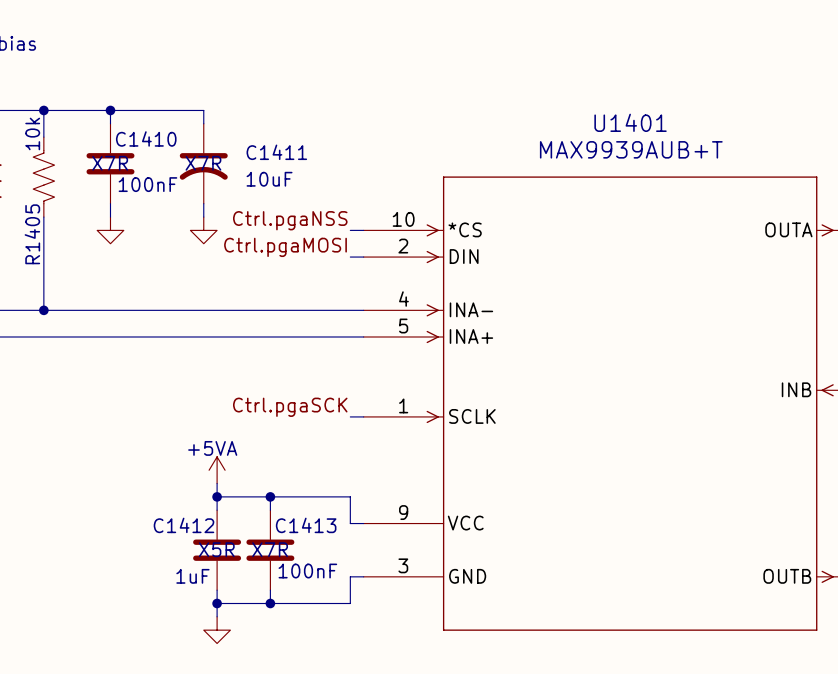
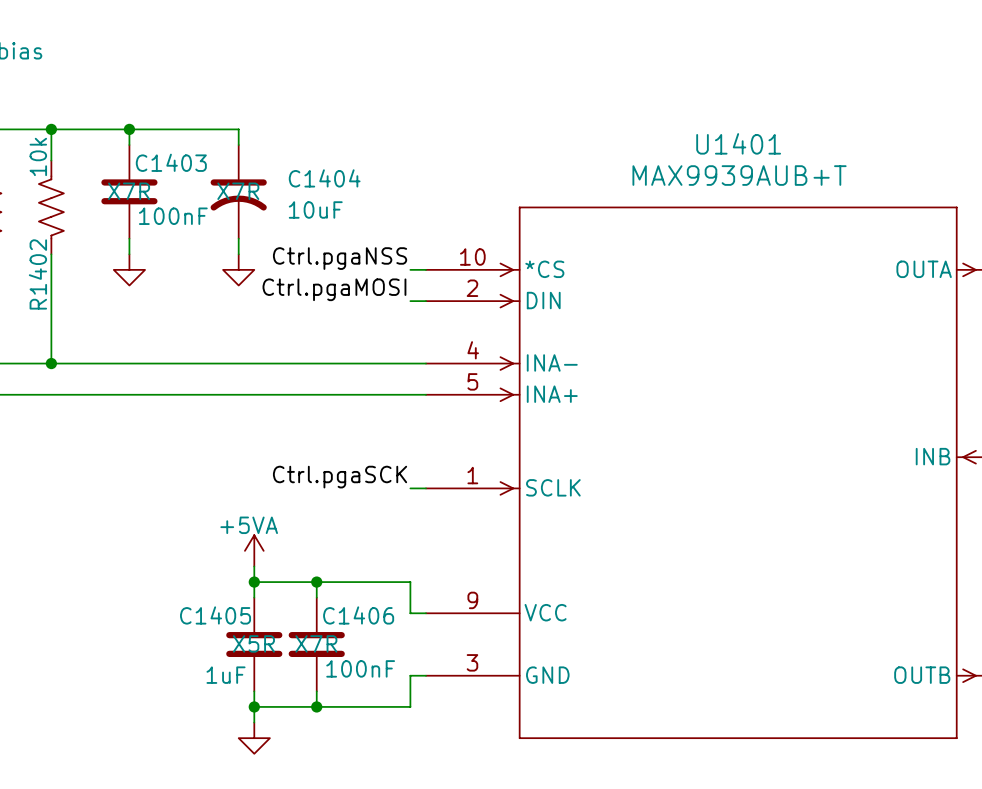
C1410 name: C1410 (146, 138) -> C1403 (171, 162)
C1411 name: C1411 (276, 152) -> C1404 (324, 178)
R1405 name: R1405 (32, 234) -> R1402 (37, 274)
C1412 name: C1412 (183, 525) -> C1405 (215, 615)
C1413 name: C1413 (306, 525) -> C1406 (358, 615)

